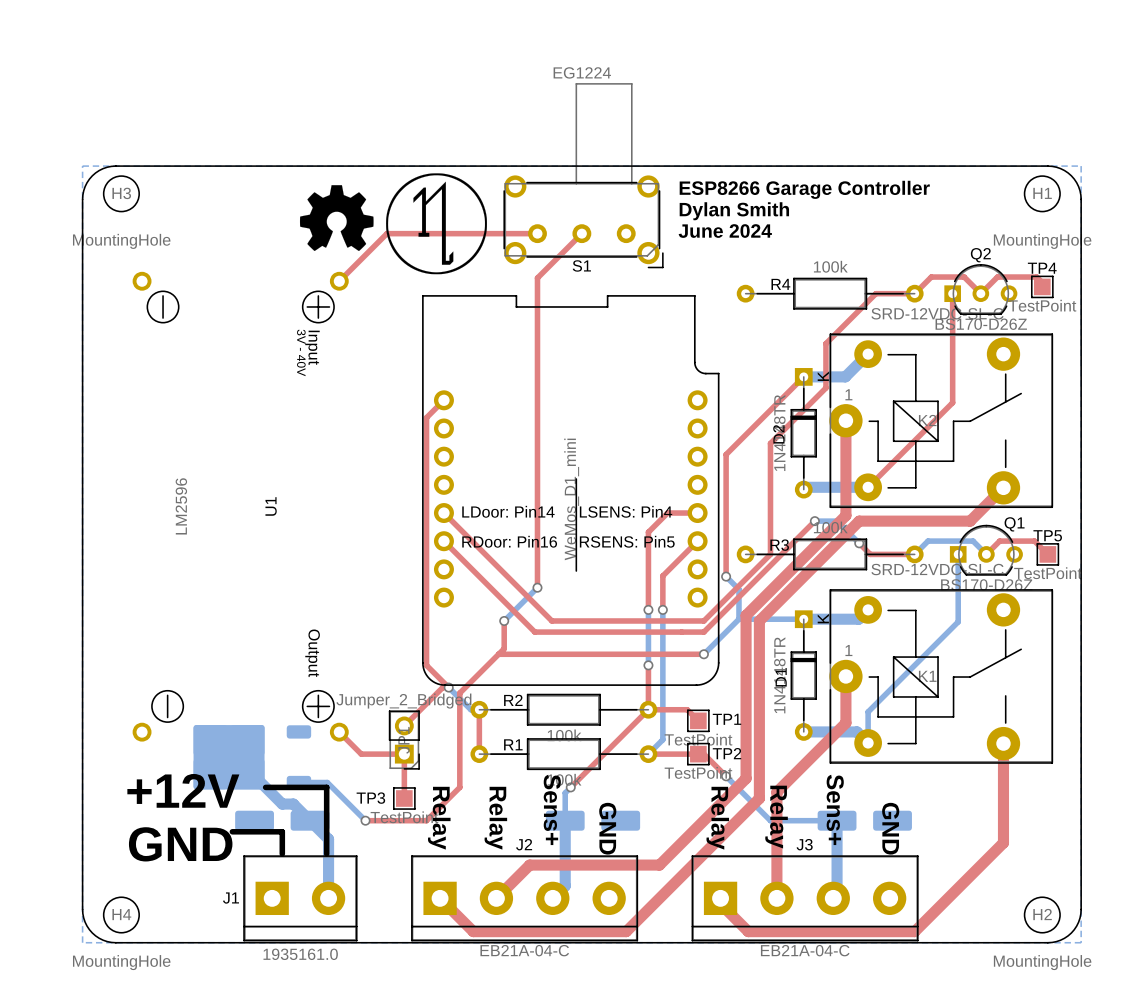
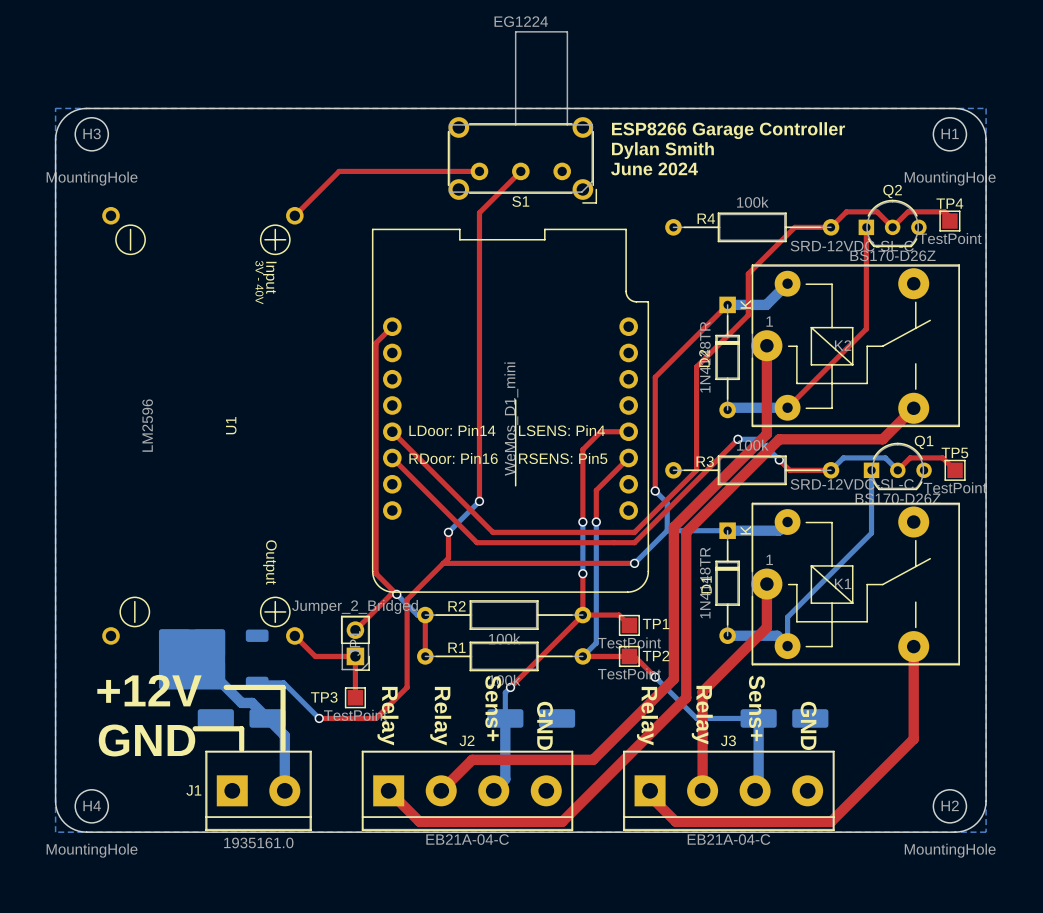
drawing: [299, 173, 487, 275] -> none

